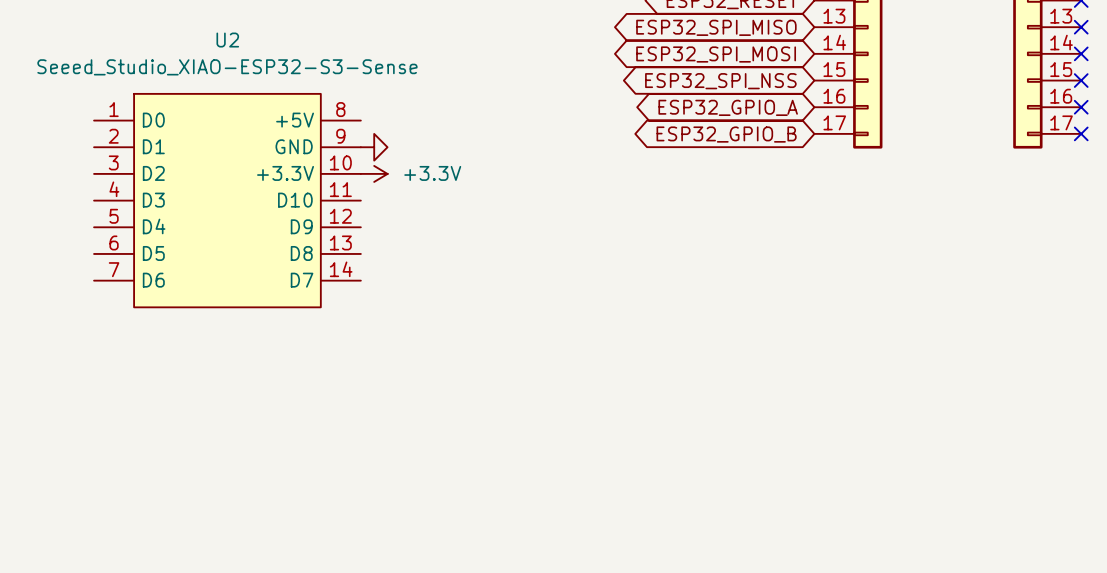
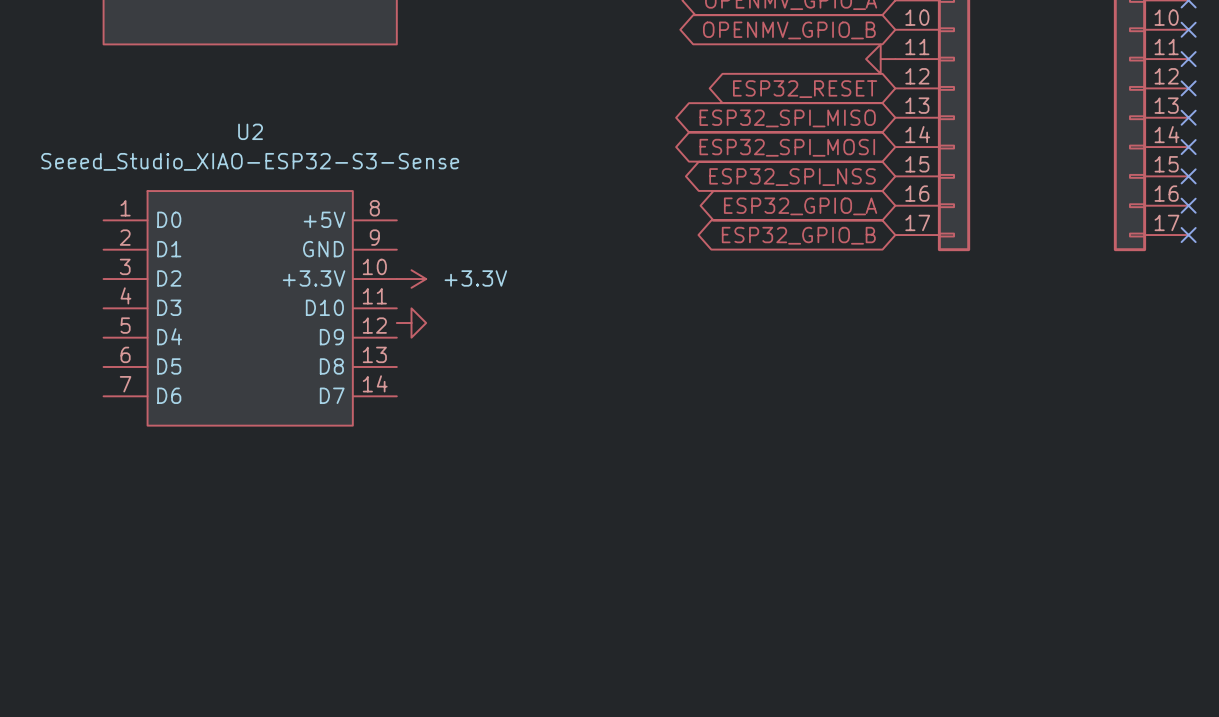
power symbol position: (374, 147) -> (411, 323)

